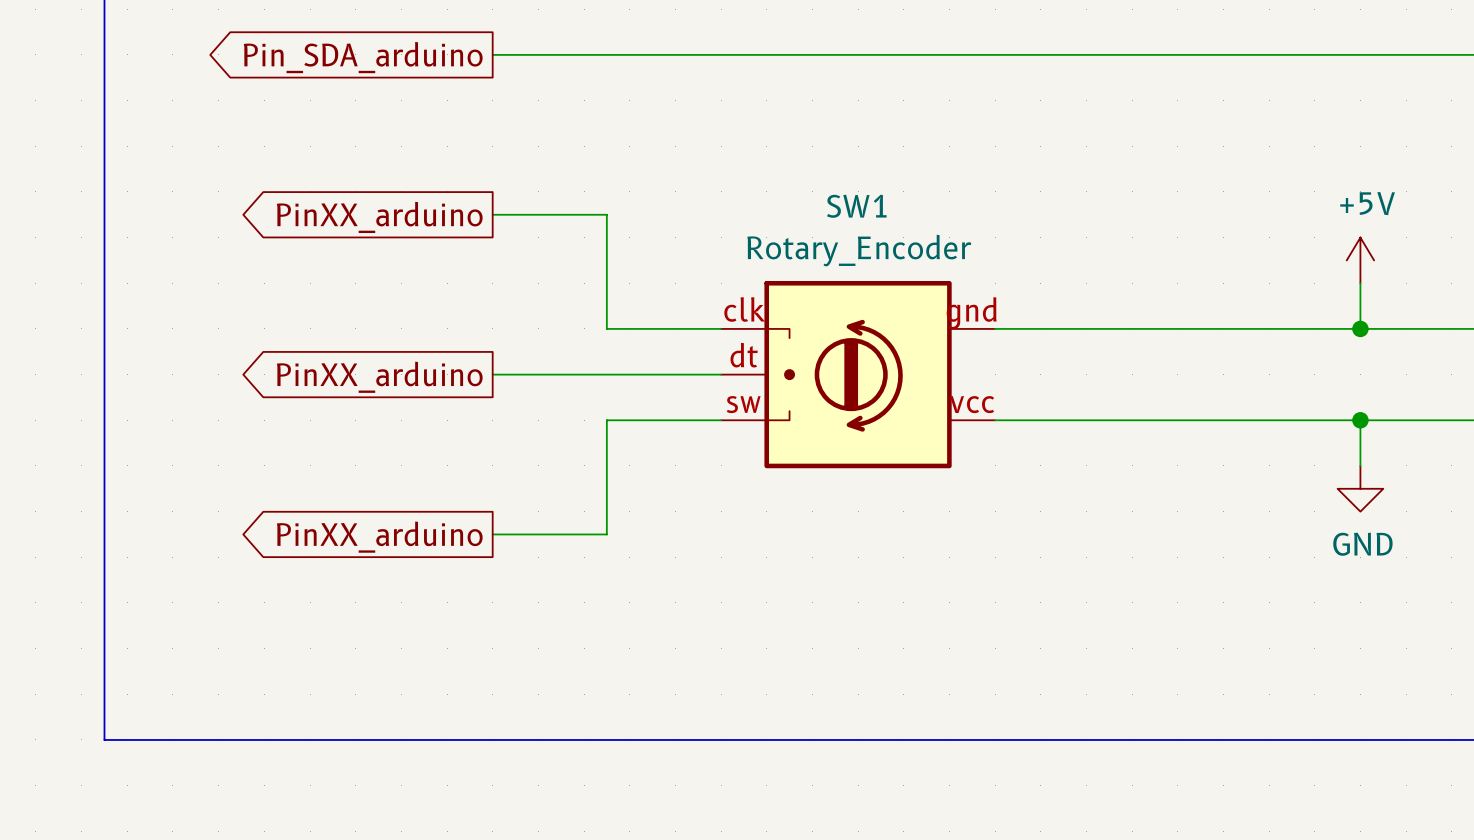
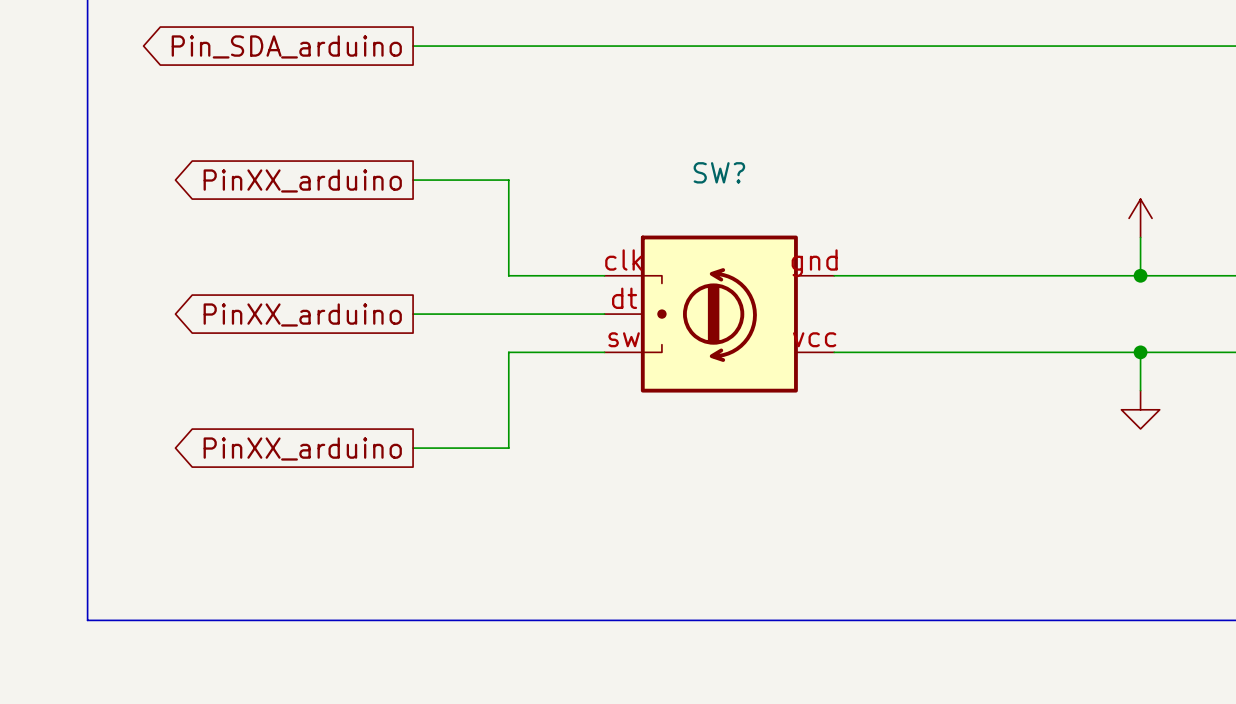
power symbol text: +5V (1367, 203) -> none
SW1 name: SW1 (856, 206) -> SW? (719, 172)
SW1 value: Rotary_Encoder (859, 250) -> none
power symbol text: GND (1362, 544) -> none

